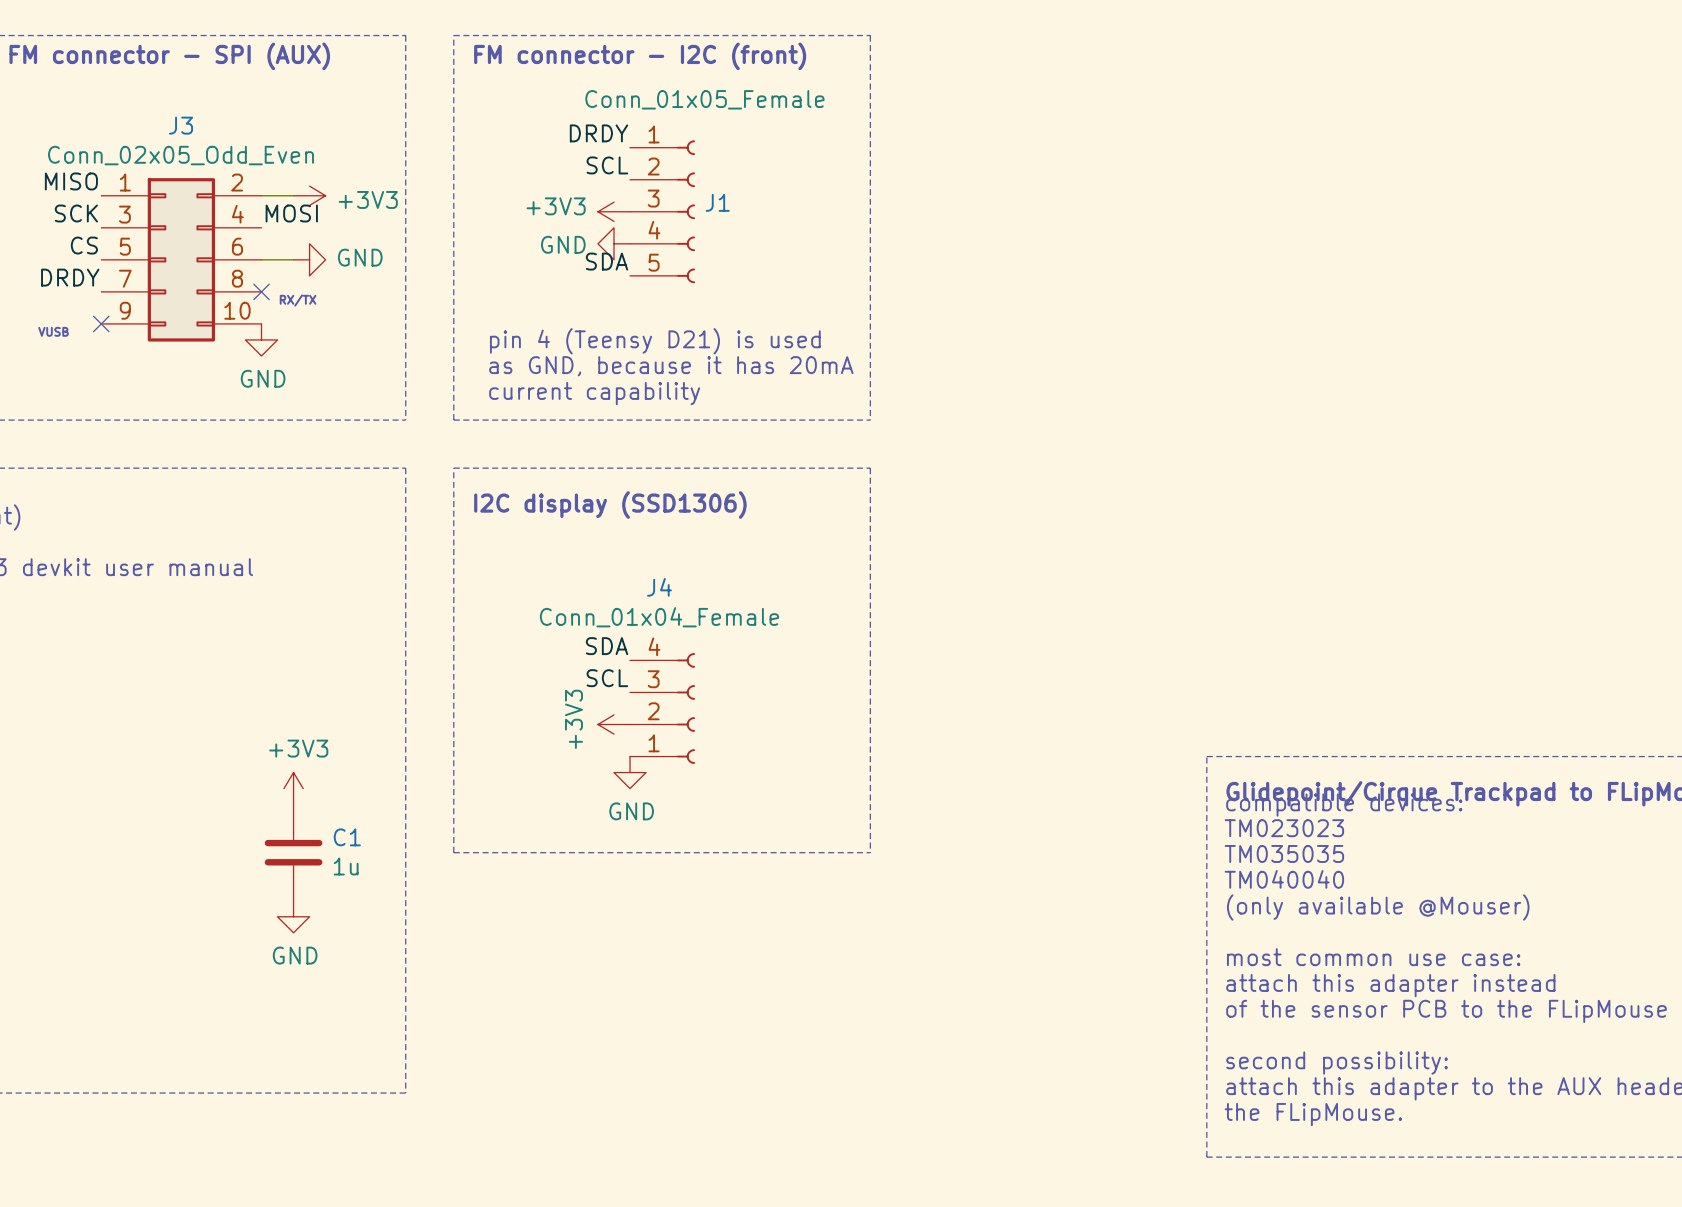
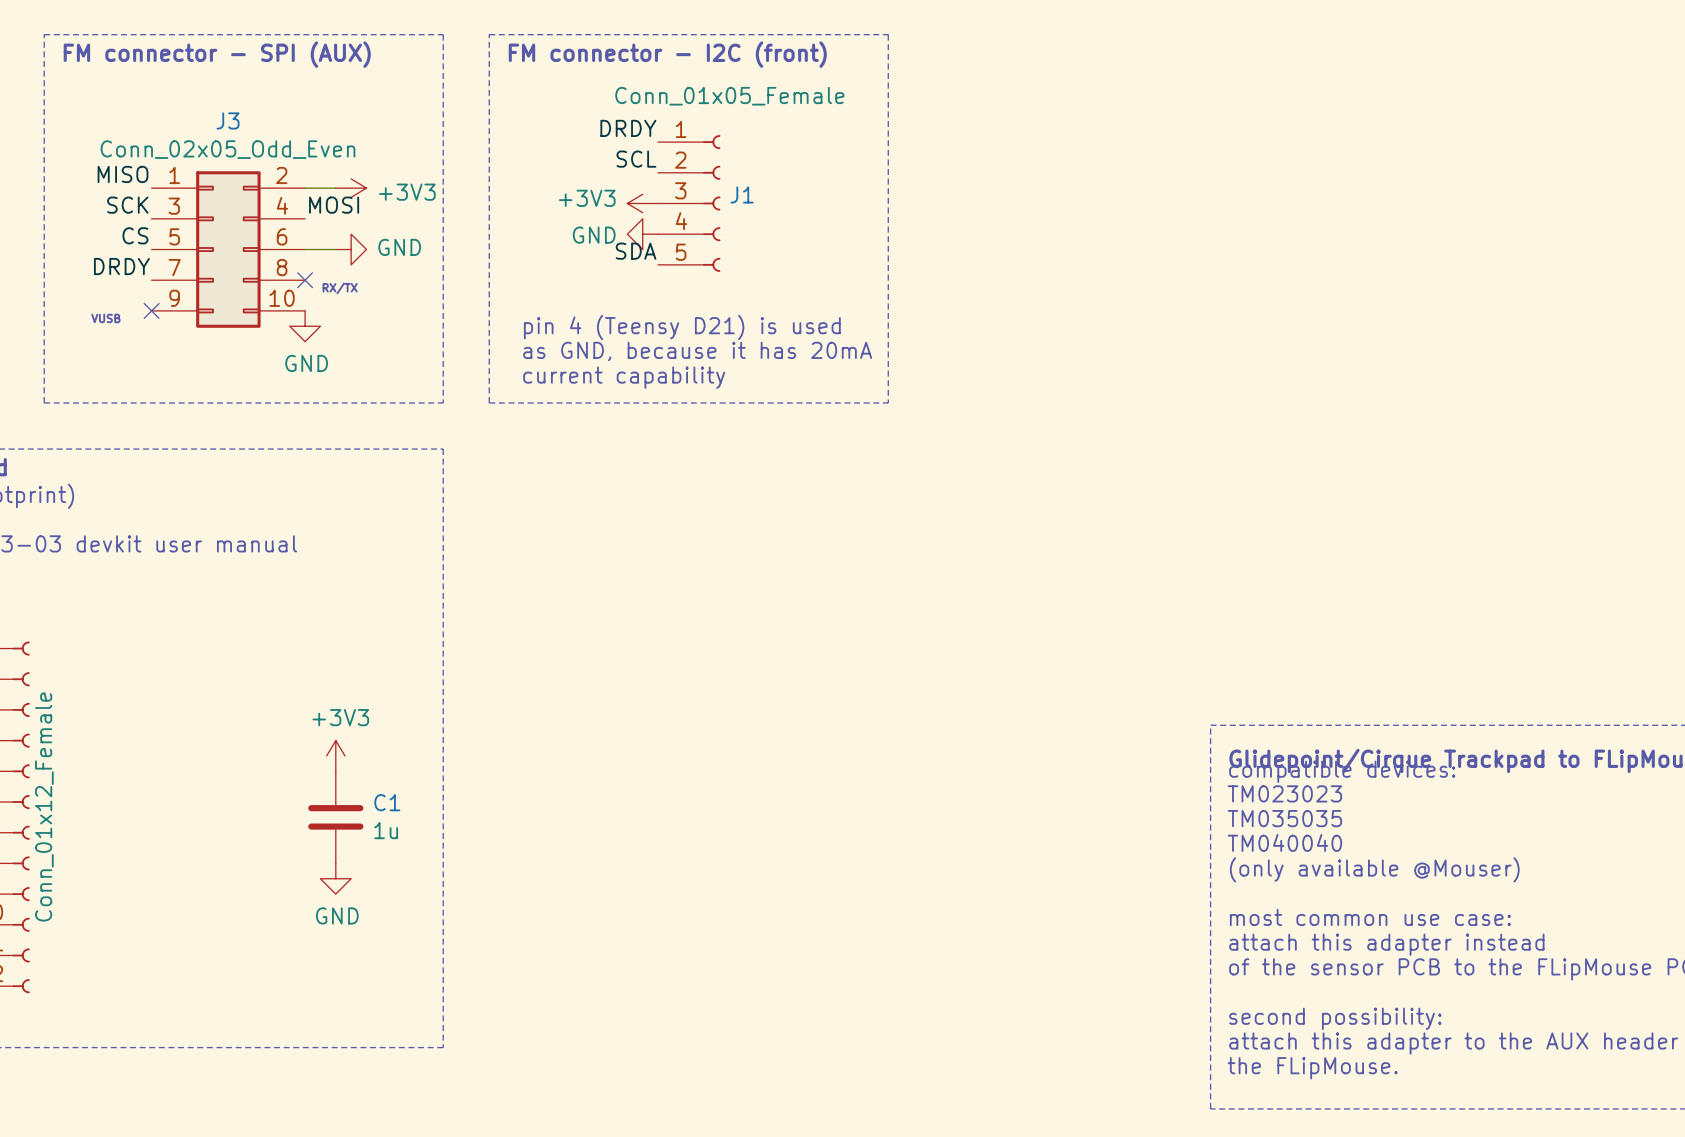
line: (453, 468) (453, 852) (870, 852) (870, 468) (453, 468) -> none
text: I2C display (SSD1306) (610, 505) -> none
label: SDA (607, 646) -> none
label: SCL (607, 678) -> none
J4: Conn_01x04_Female (662, 708) -> none
power symbol: +3V3 (614, 724) -> none
power symbol: GND (630, 772) -> none

